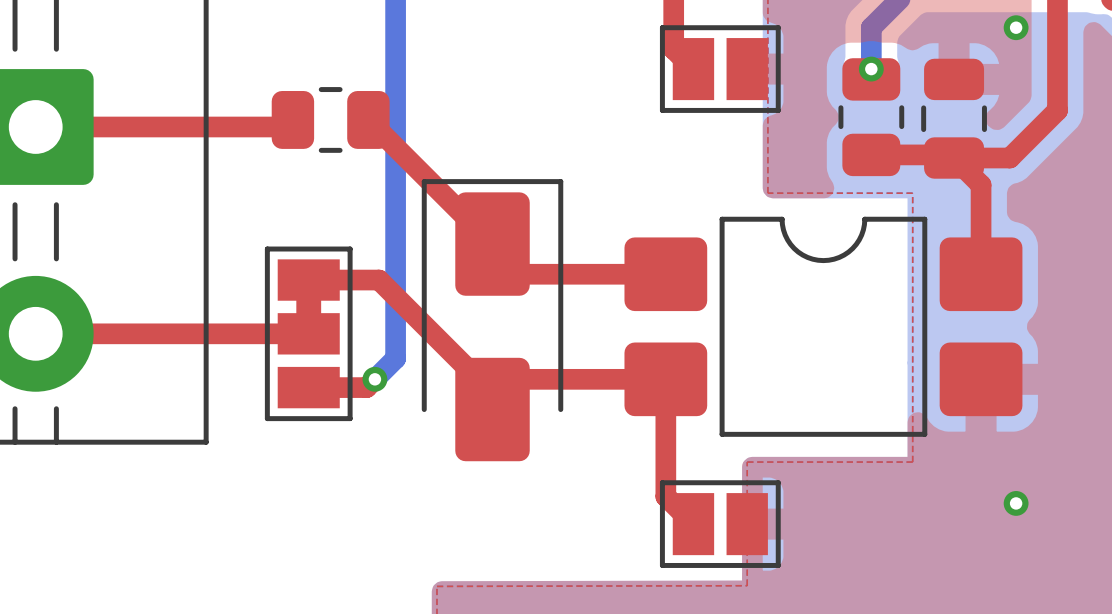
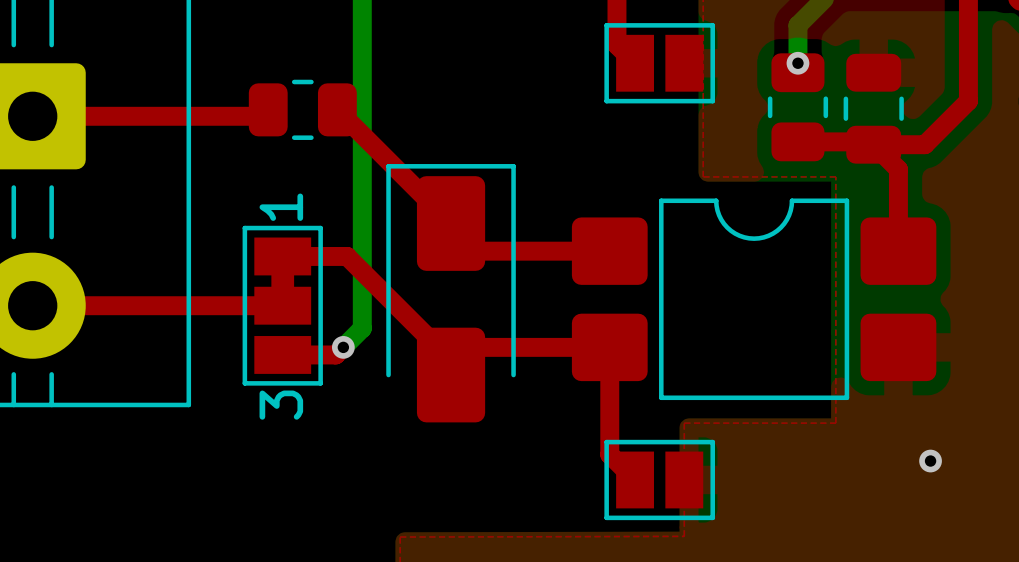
via: (1016, 27) -> none
part text: none -> 1 (281, 207)
part text: none -> 3 (281, 405)

